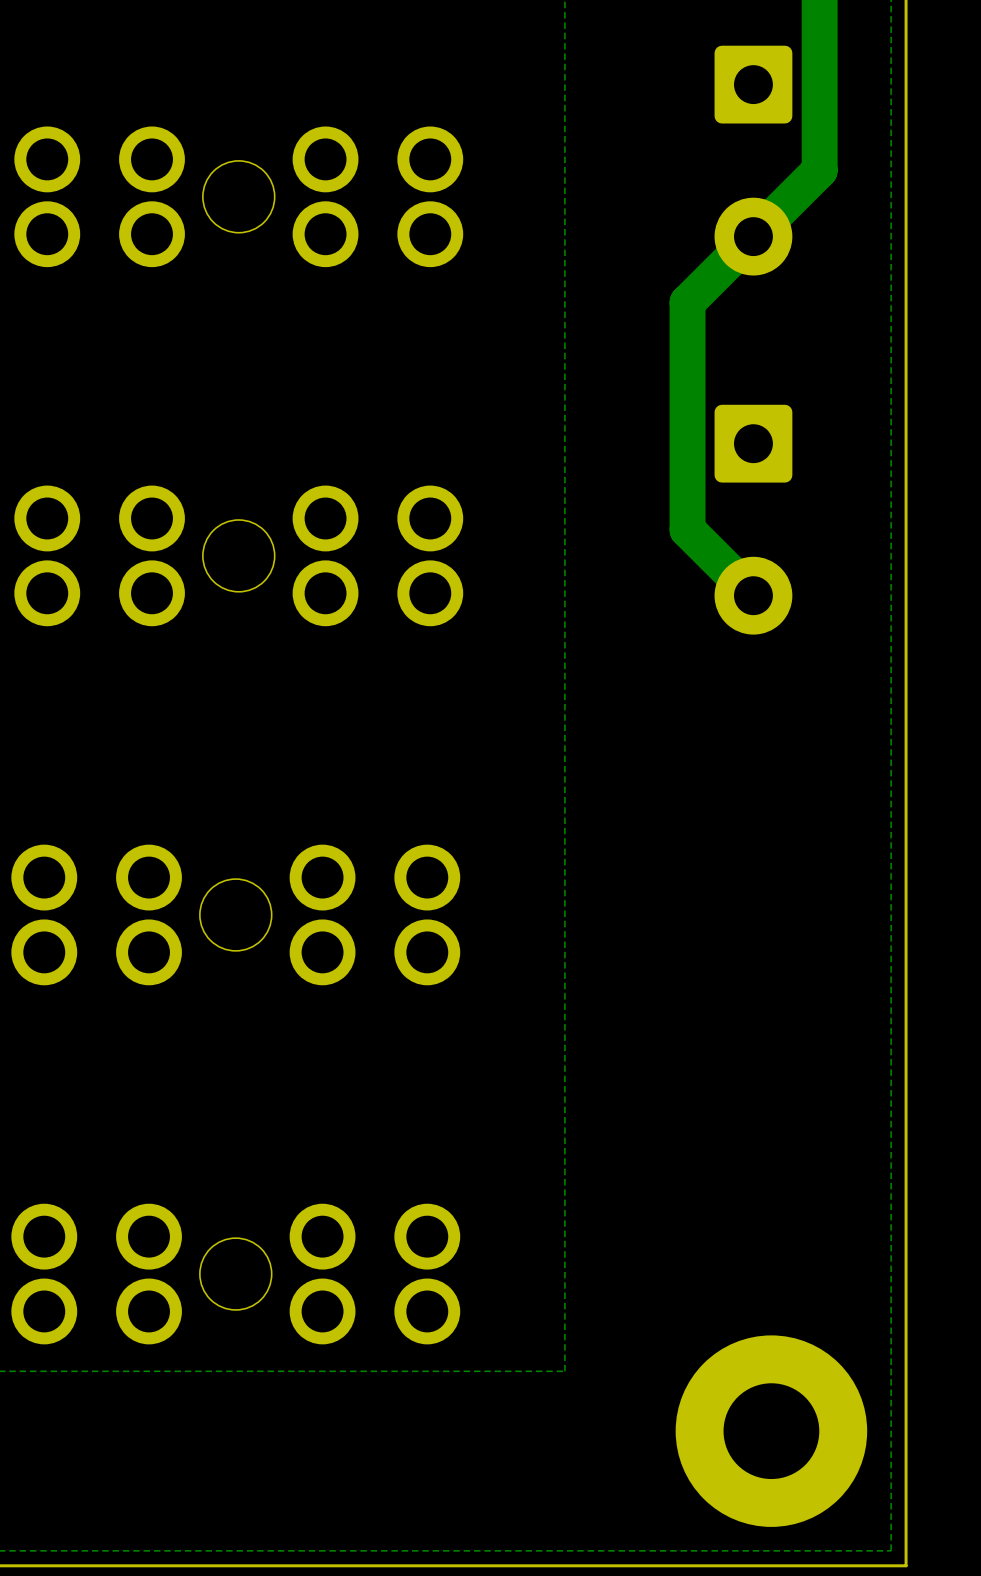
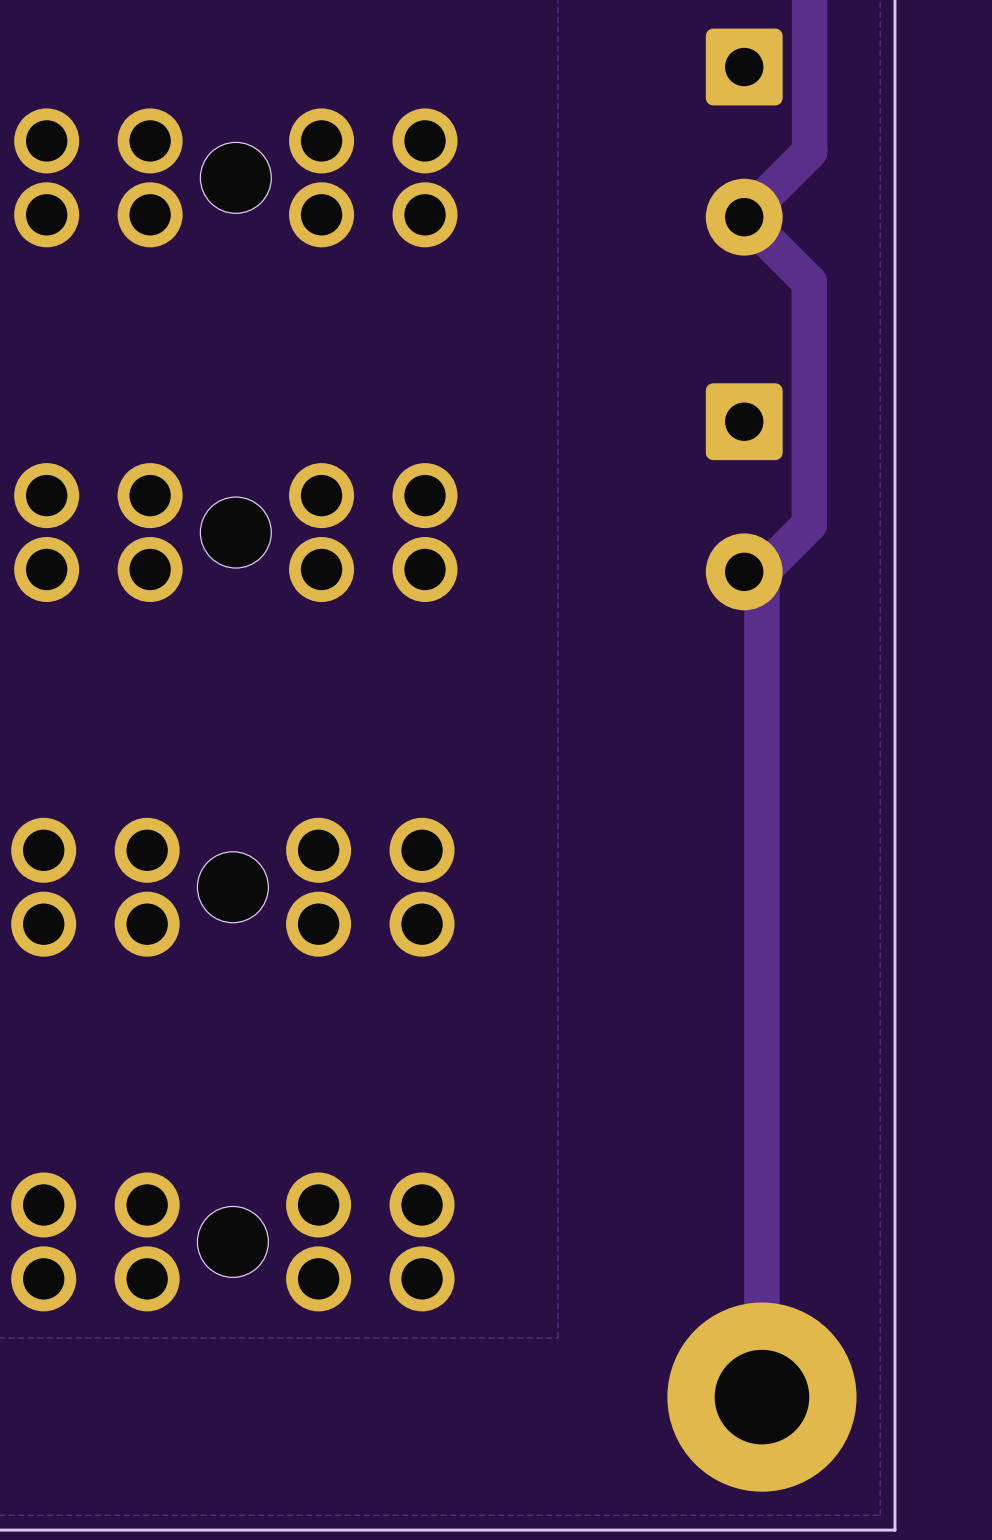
track: (753, 236) (687, 302) (687, 529) (753, 595) -> (744, 217) (809, 282) (809, 524) (761, 571)
track: none -> (761, 571) (761, 1397)

